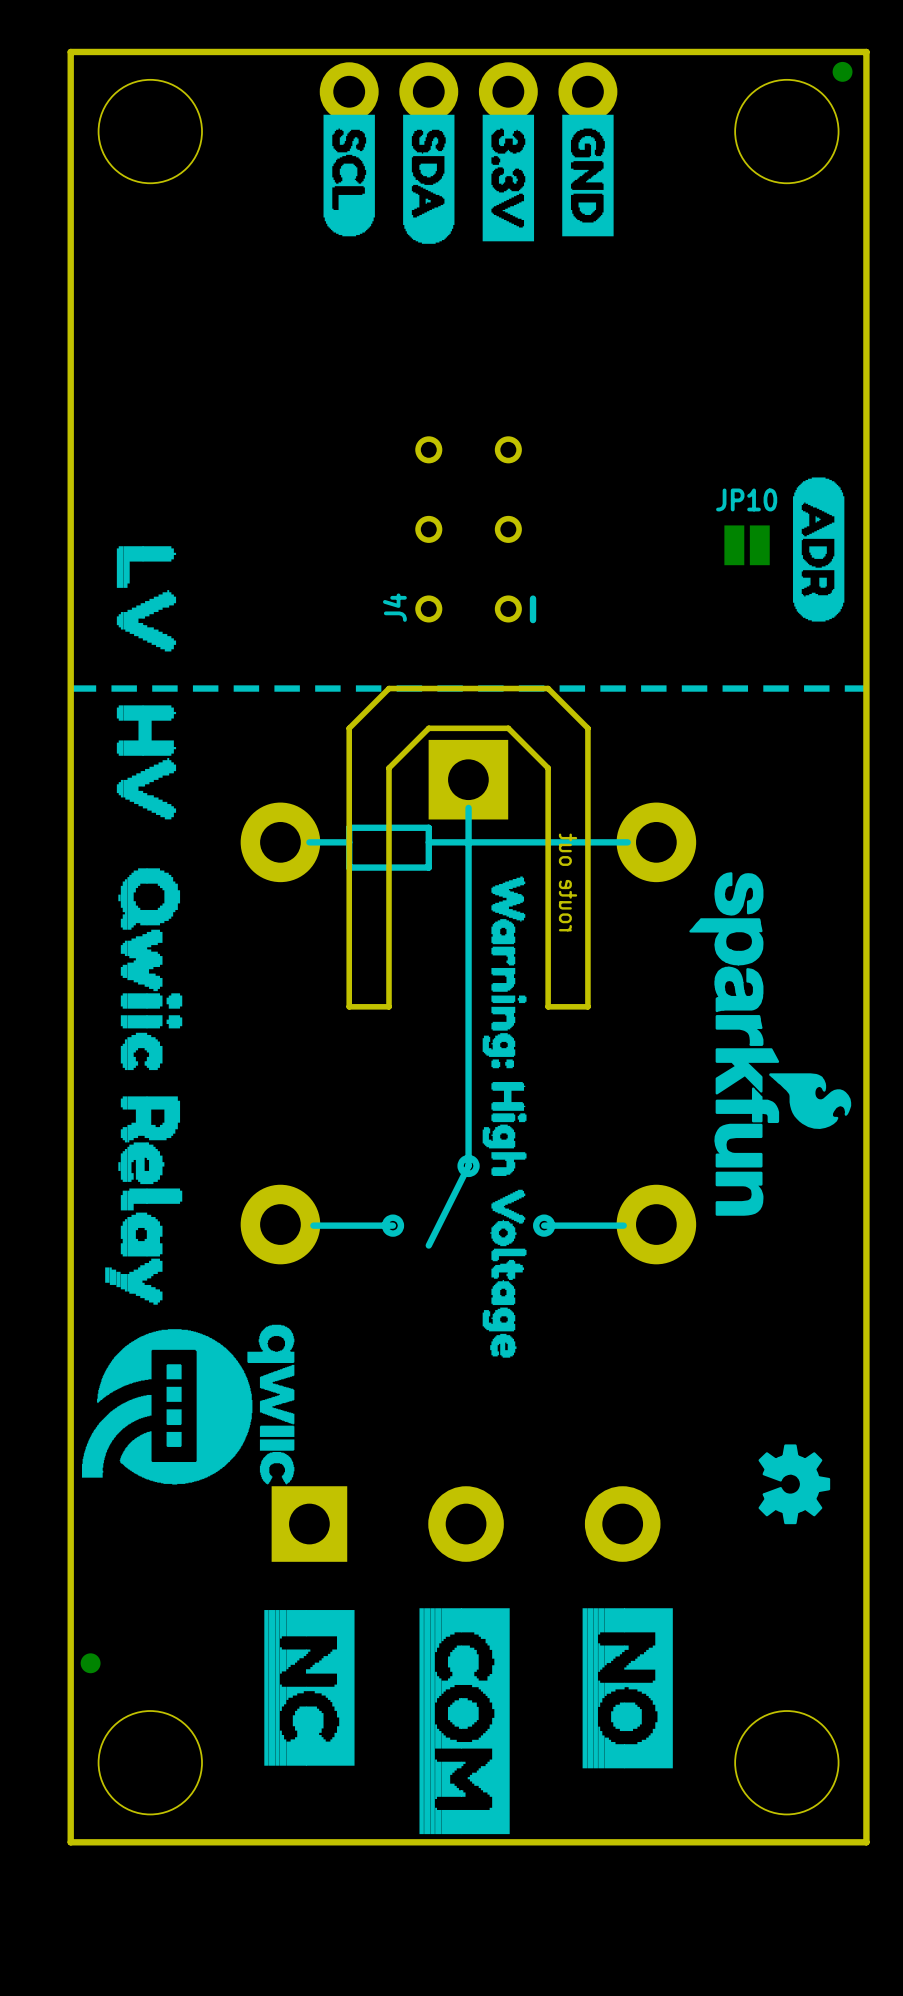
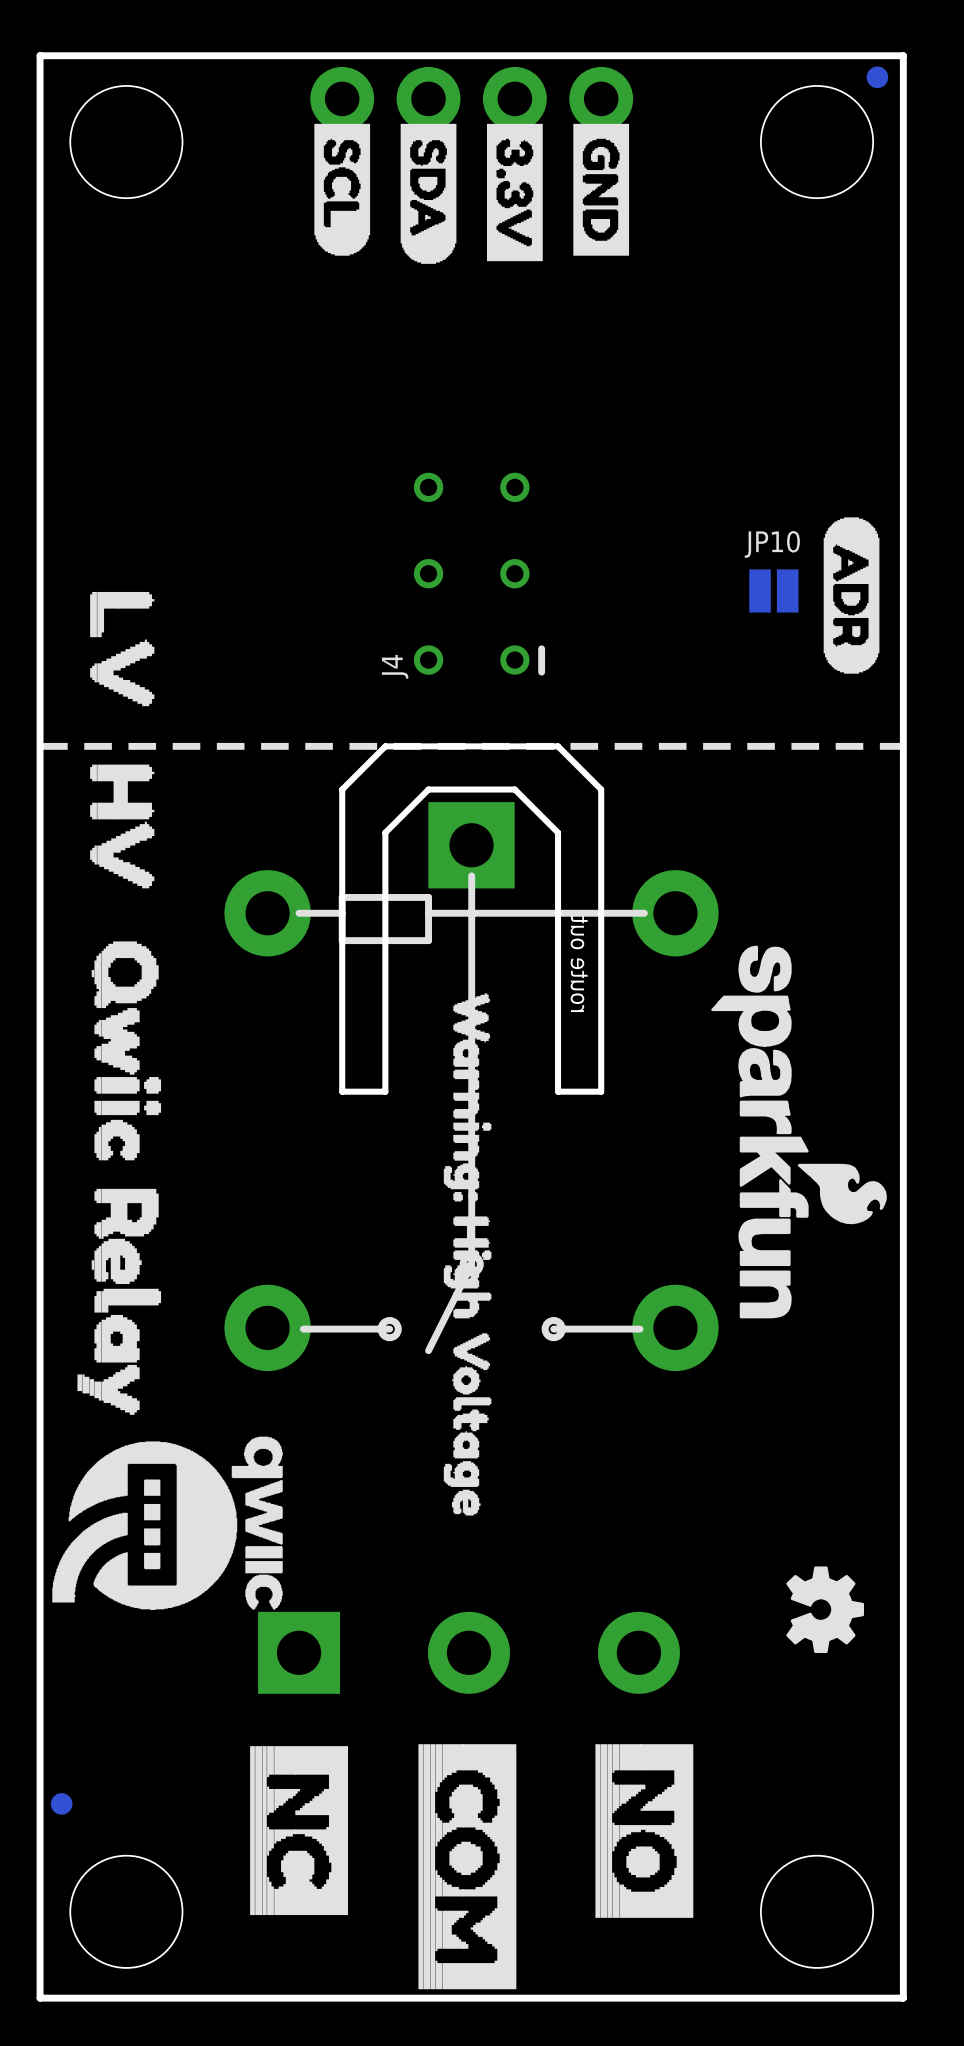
drawing position: (504, 1117) -> (467, 1254)

